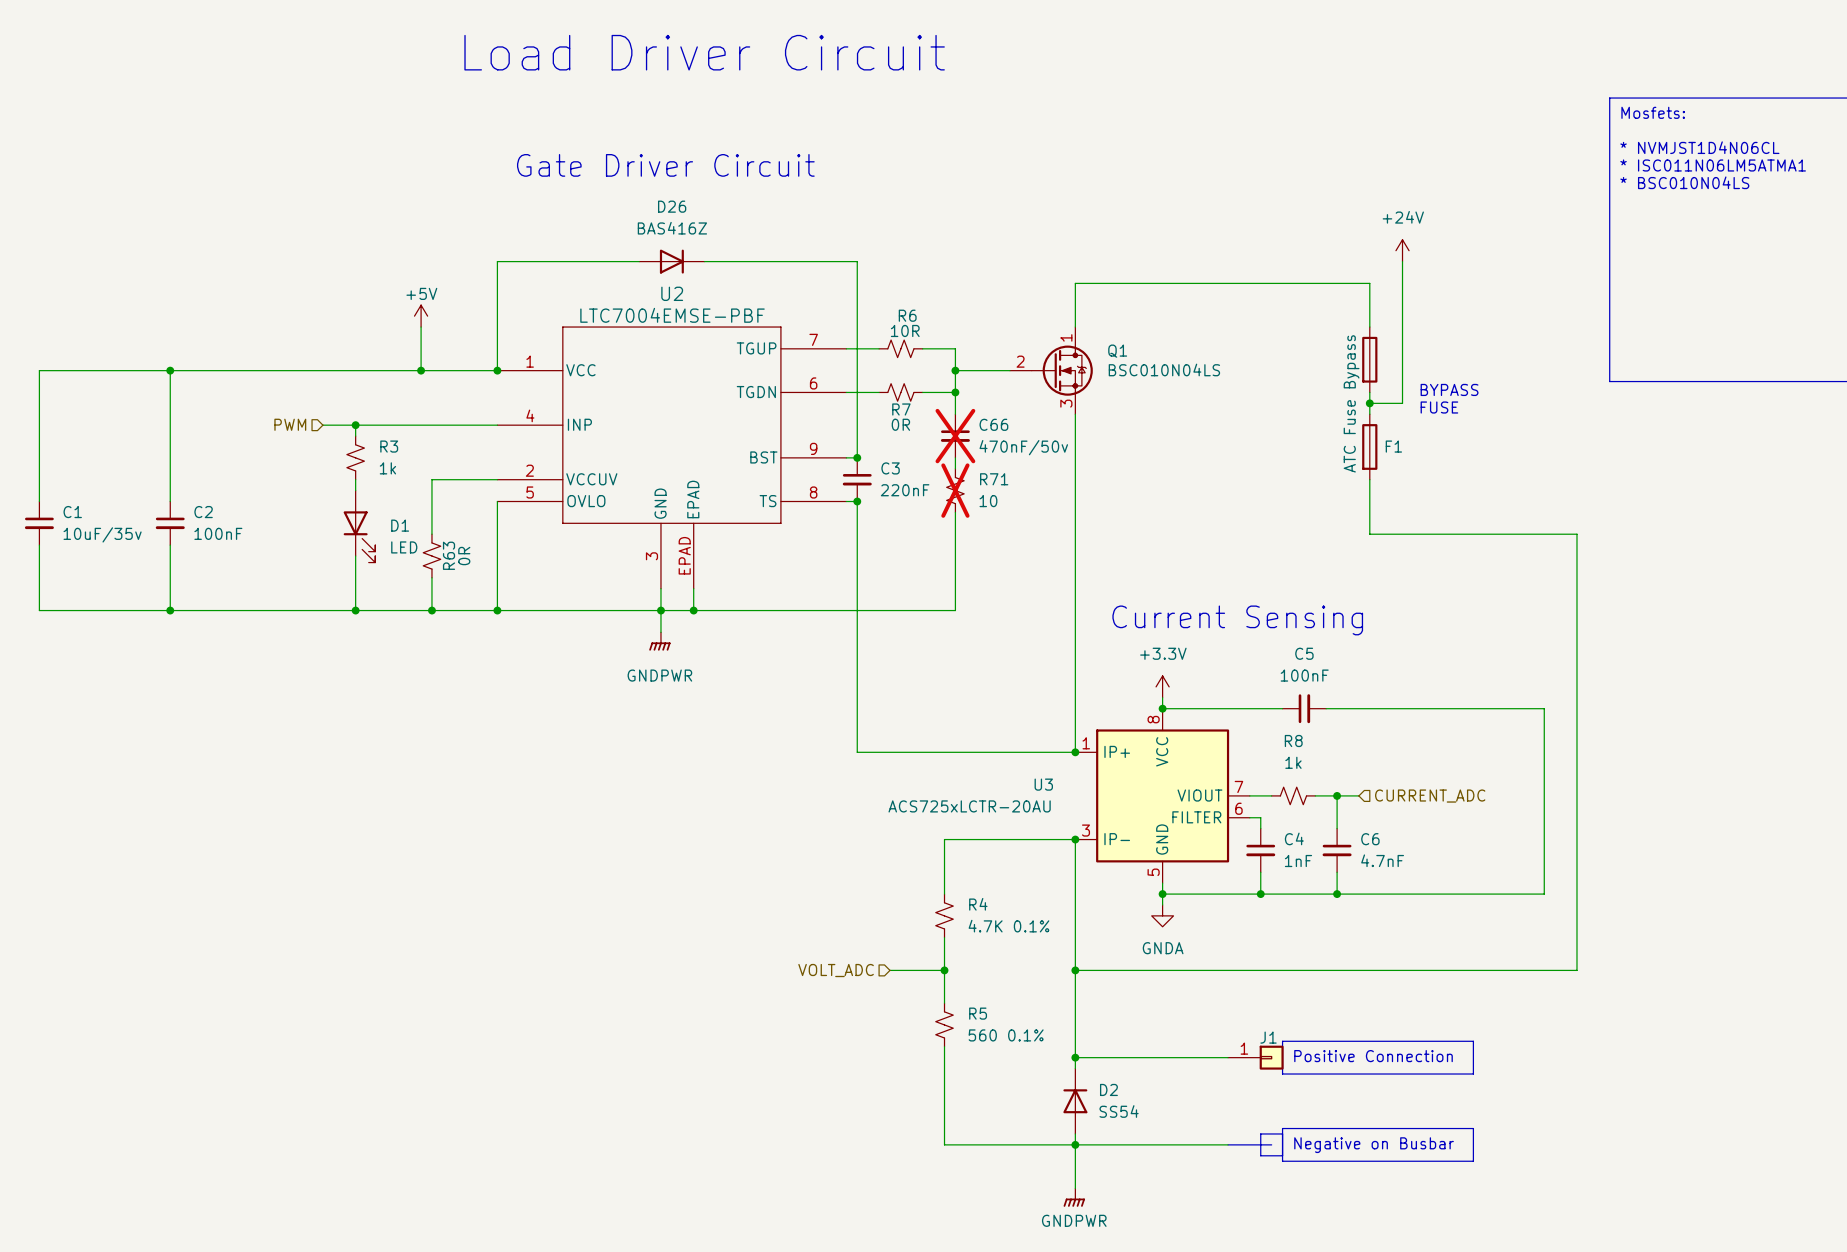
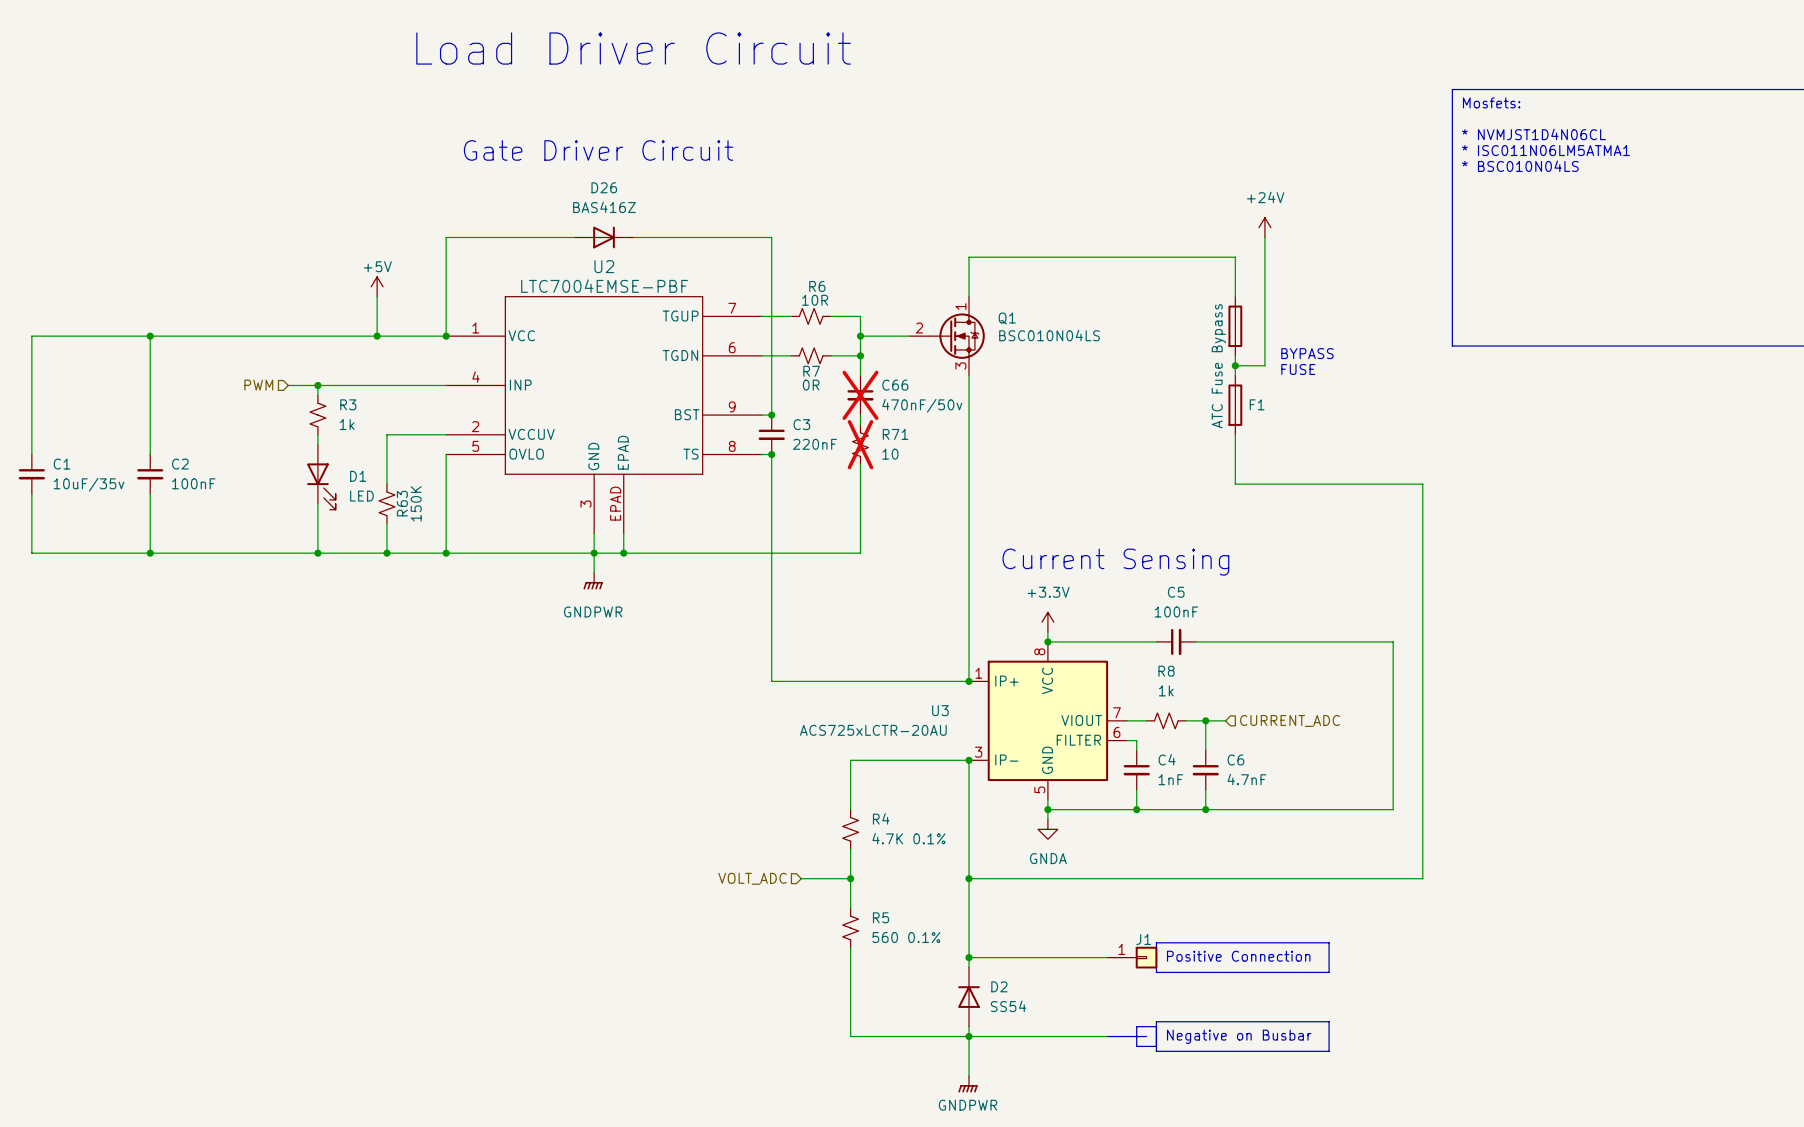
R63 value: 0R (464, 556) -> 150K (416, 503)

